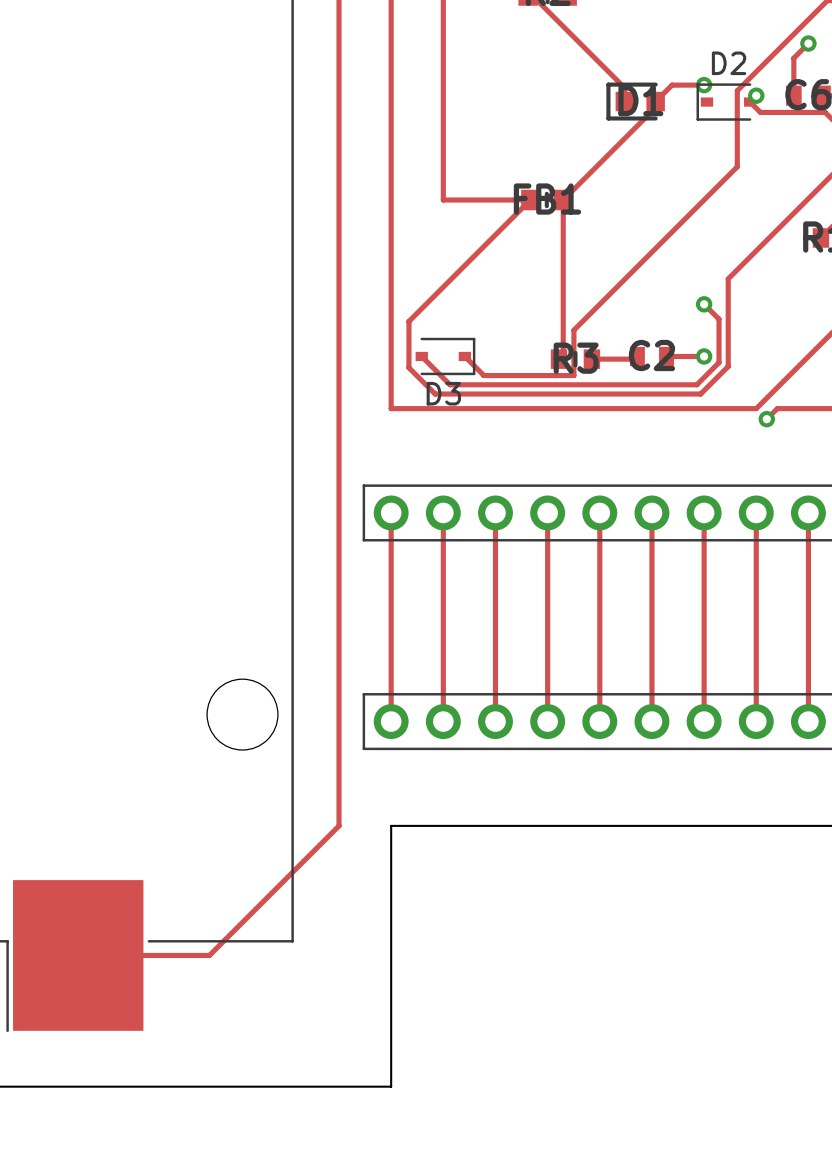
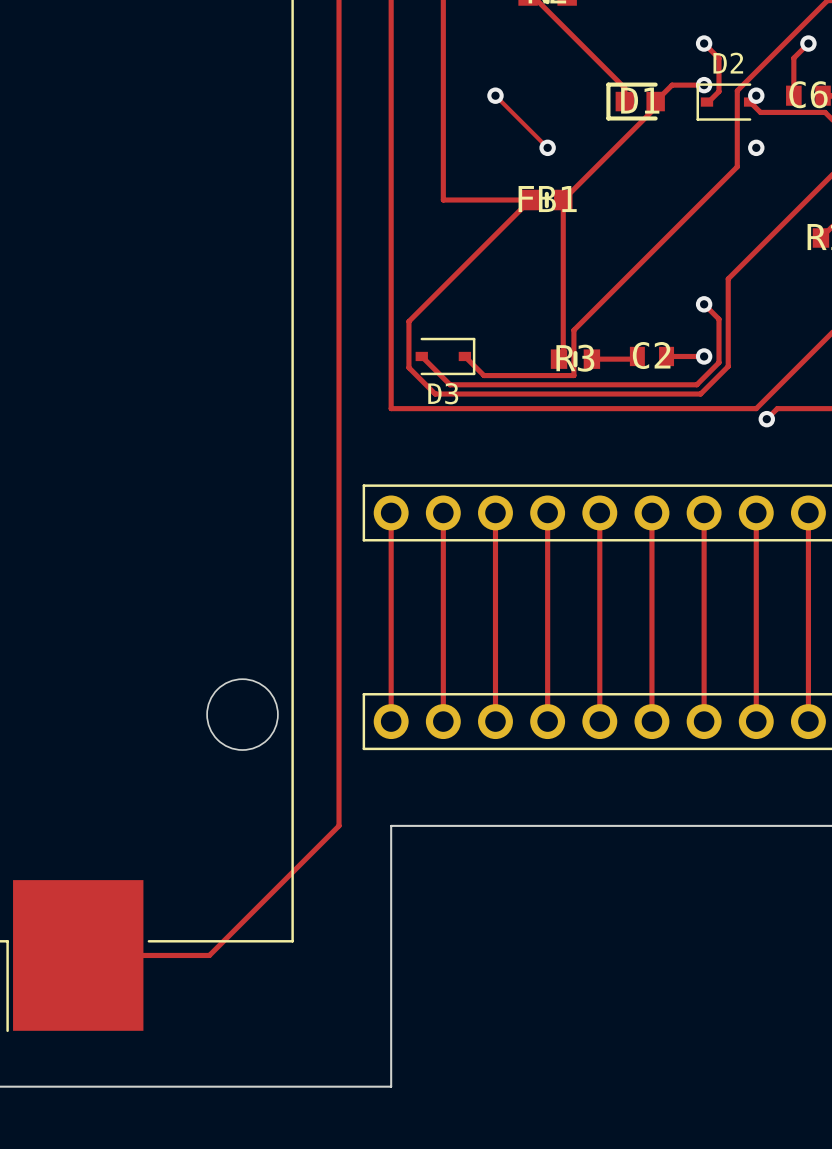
track: none -> (704, 43) (718, 58) (718, 91) (706, 102)
via: none -> (704, 43)
track: none -> (495, 95) (547, 147)
via: none -> (495, 95)
via: none -> (547, 147)
via: none -> (756, 147)

